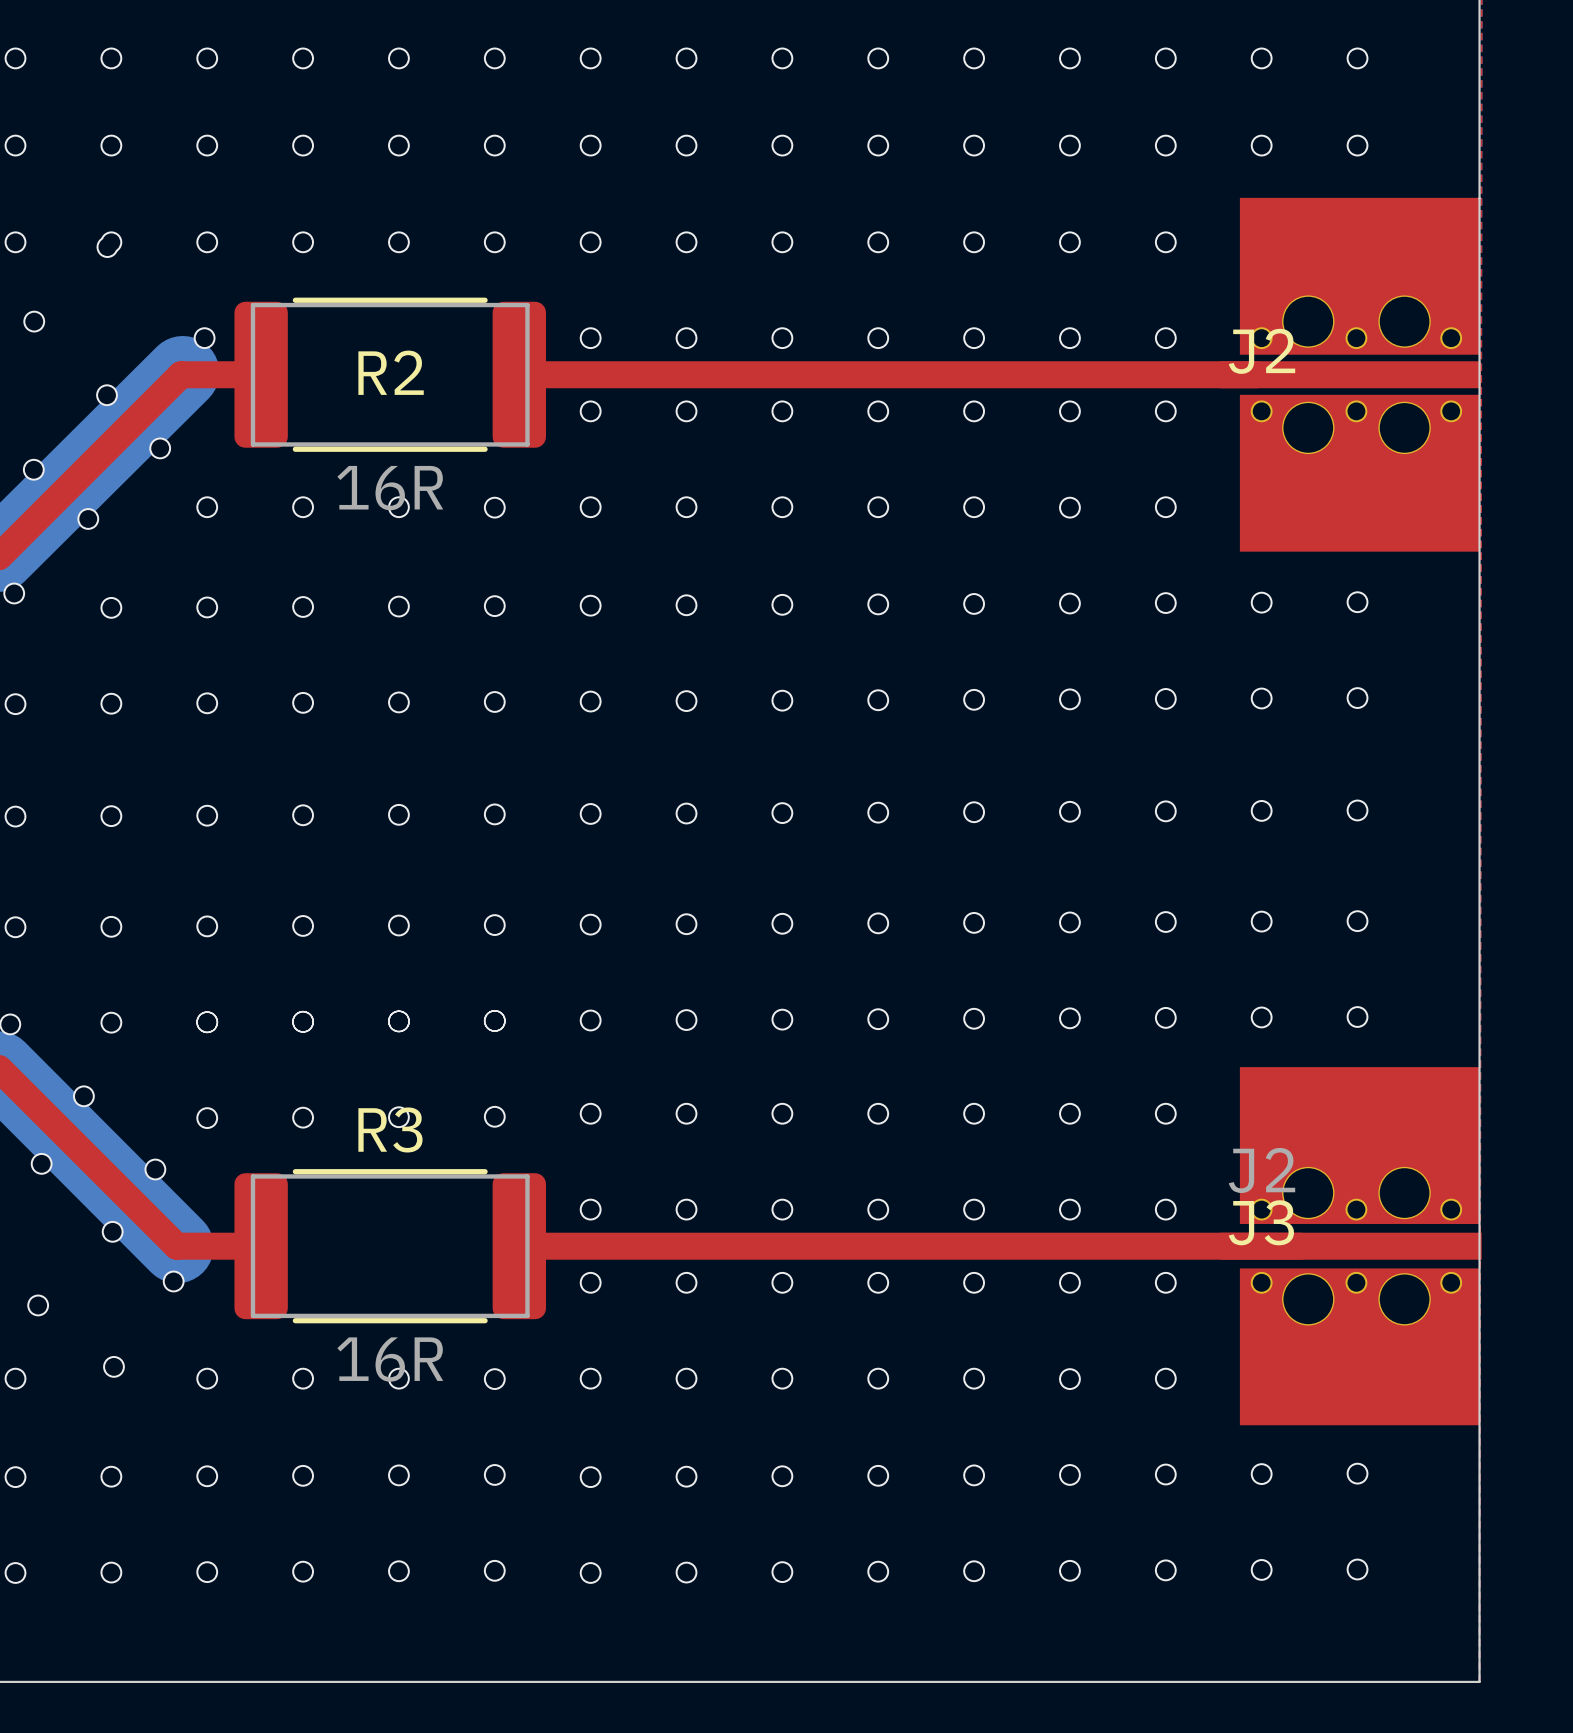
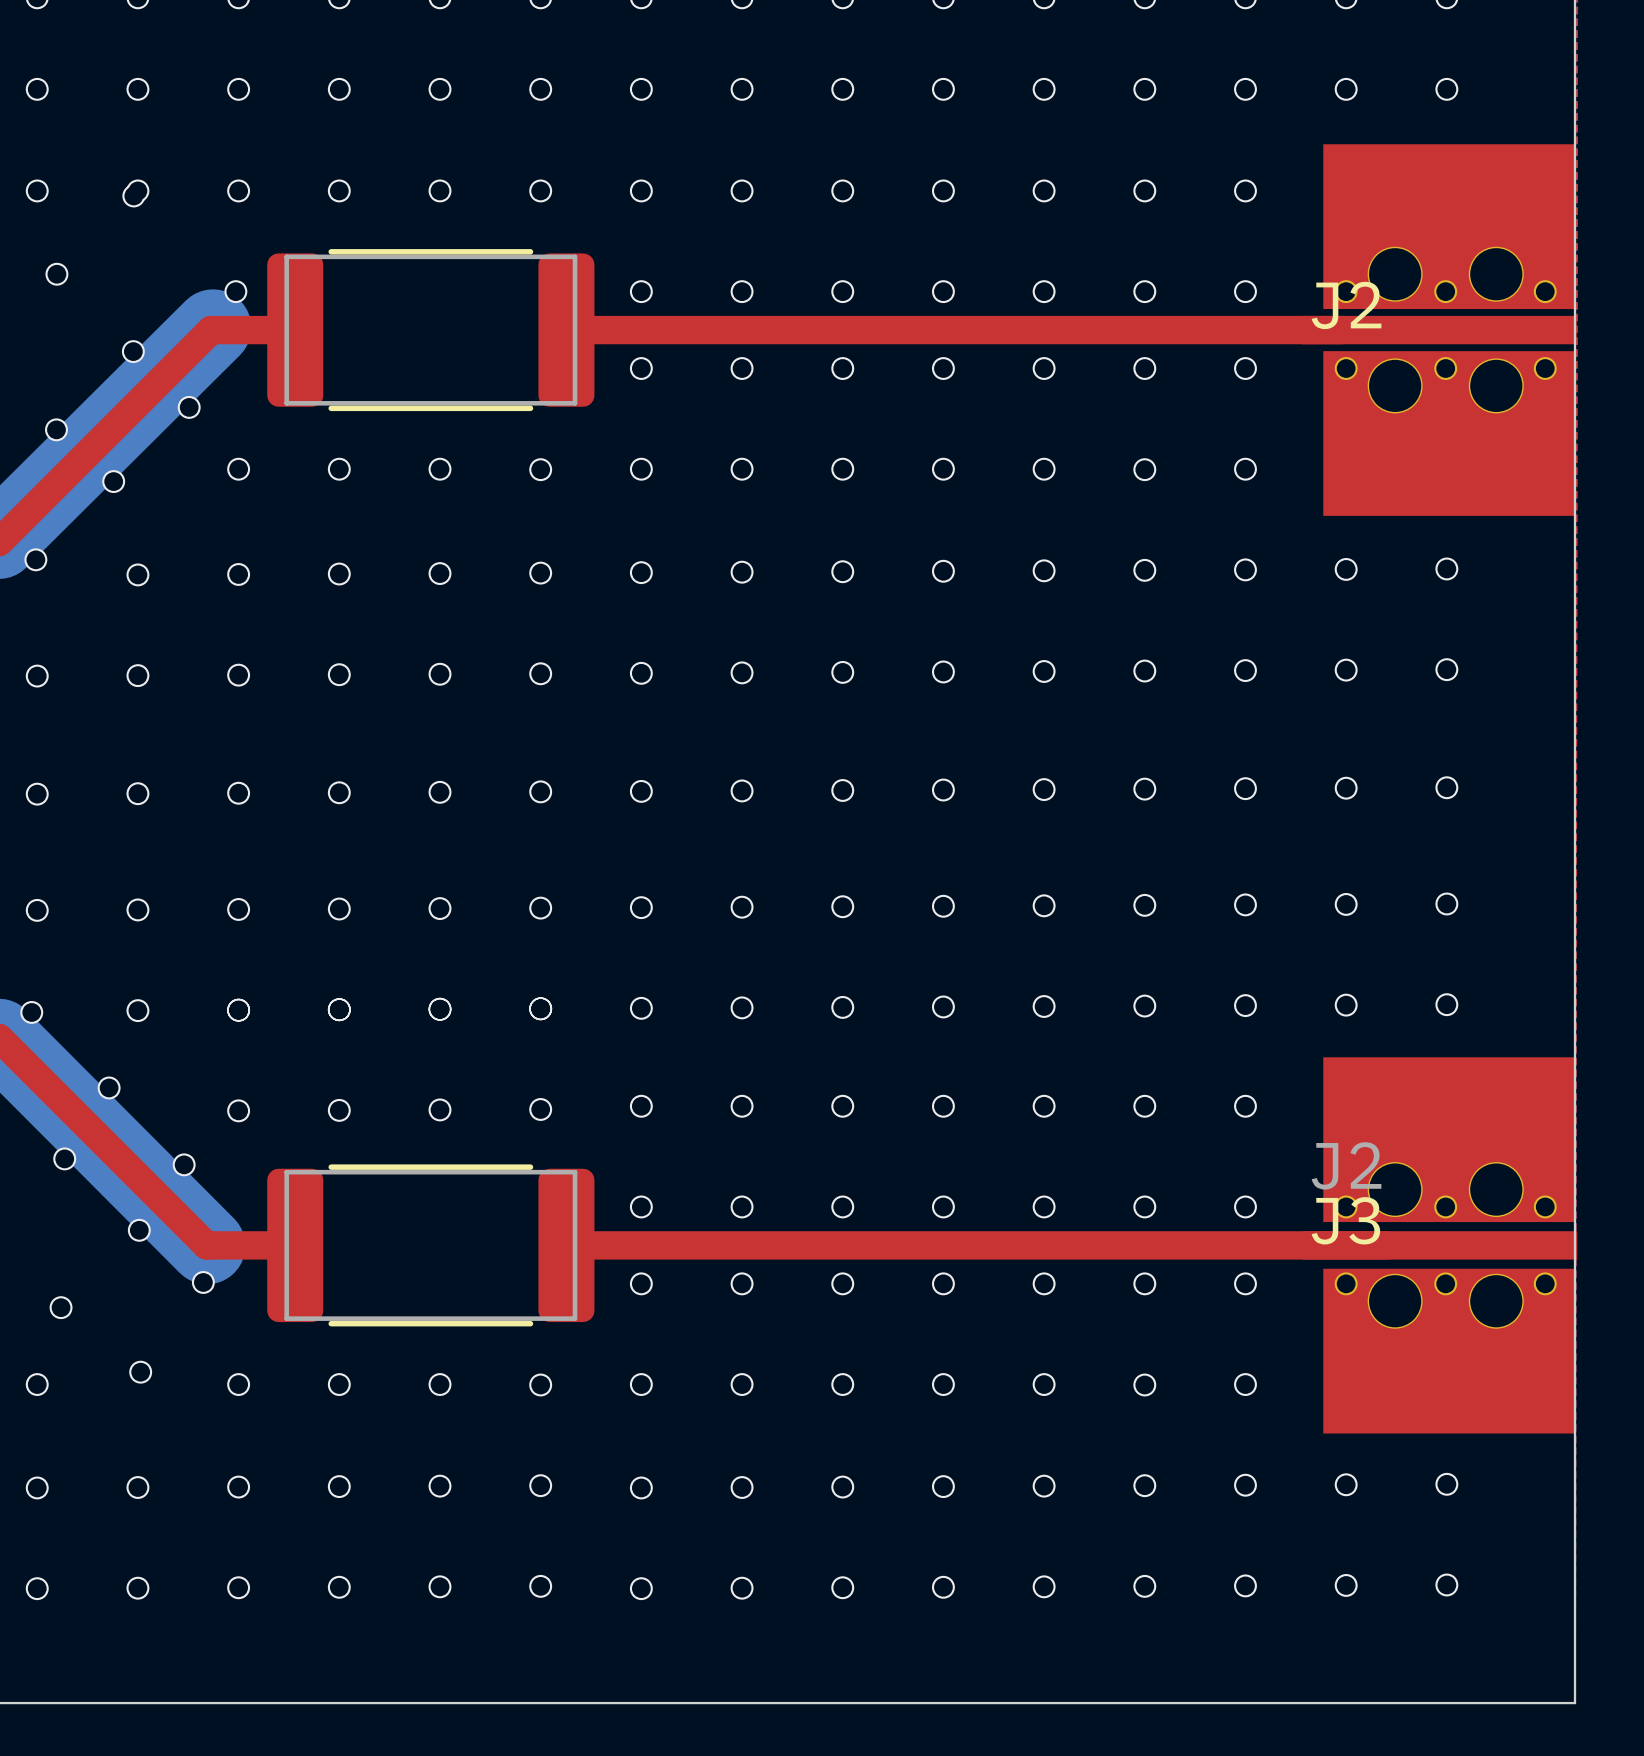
R2 name: R2 (391, 372) -> none
R2 value: 16R (390, 488) -> none
R3 name: R3 (390, 1129) -> none
R3 value: 16R (390, 1359) -> none

